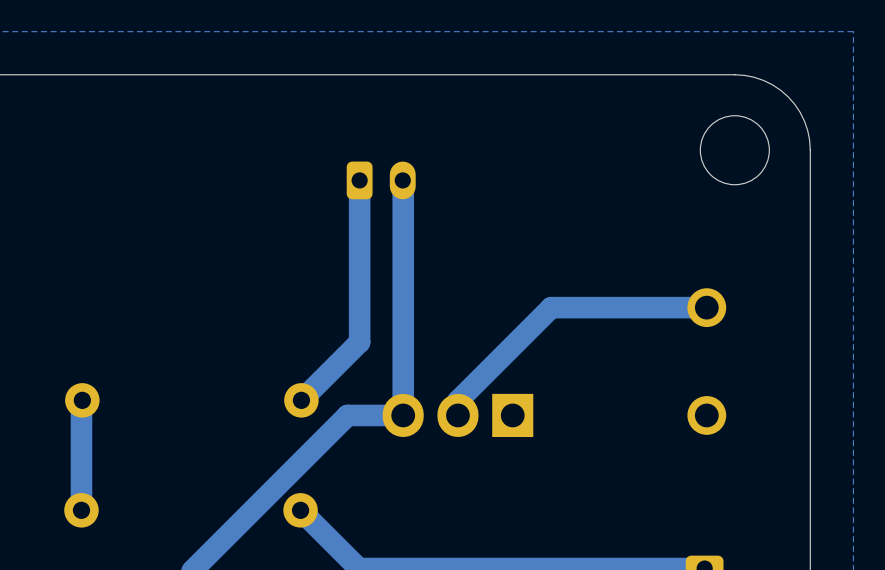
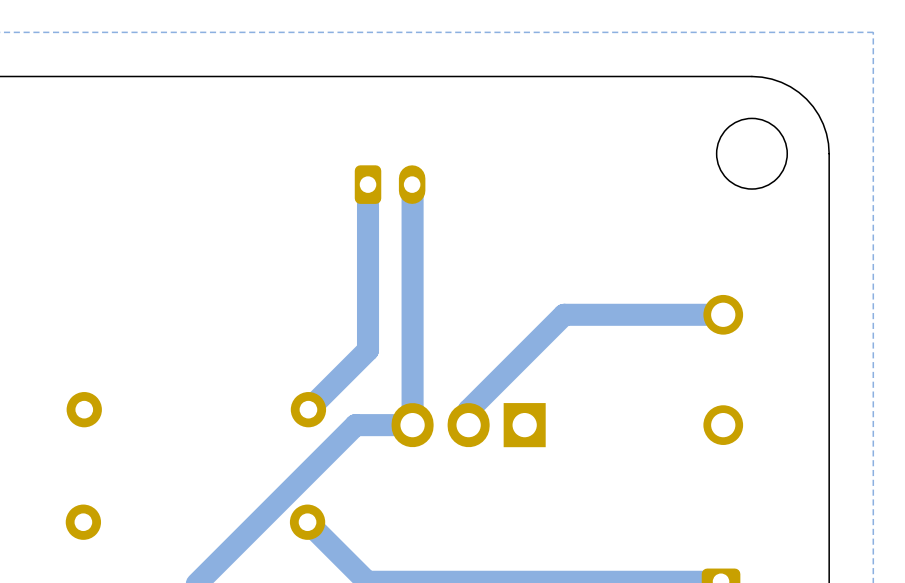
bottom track: (81, 401) (81, 510) -> none

